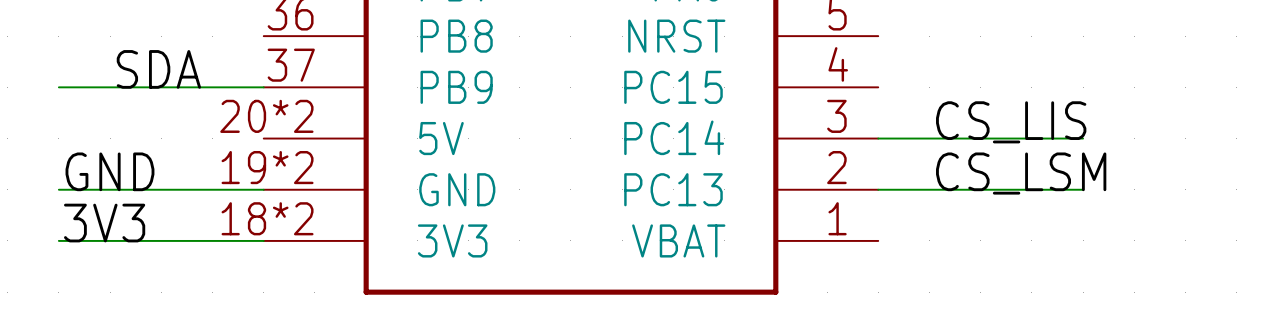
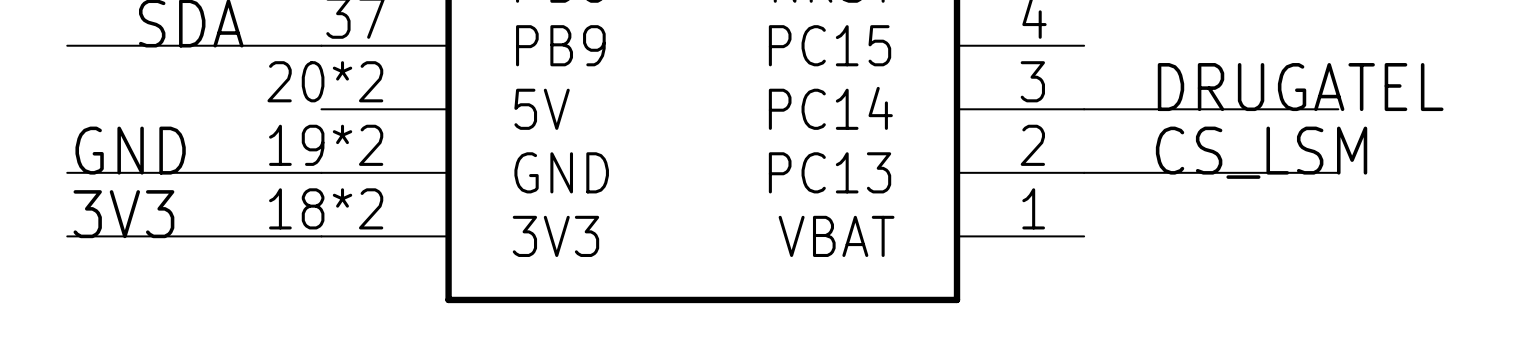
label: CS_LIS (1011, 122) -> DRUGATEL (1300, 87)

